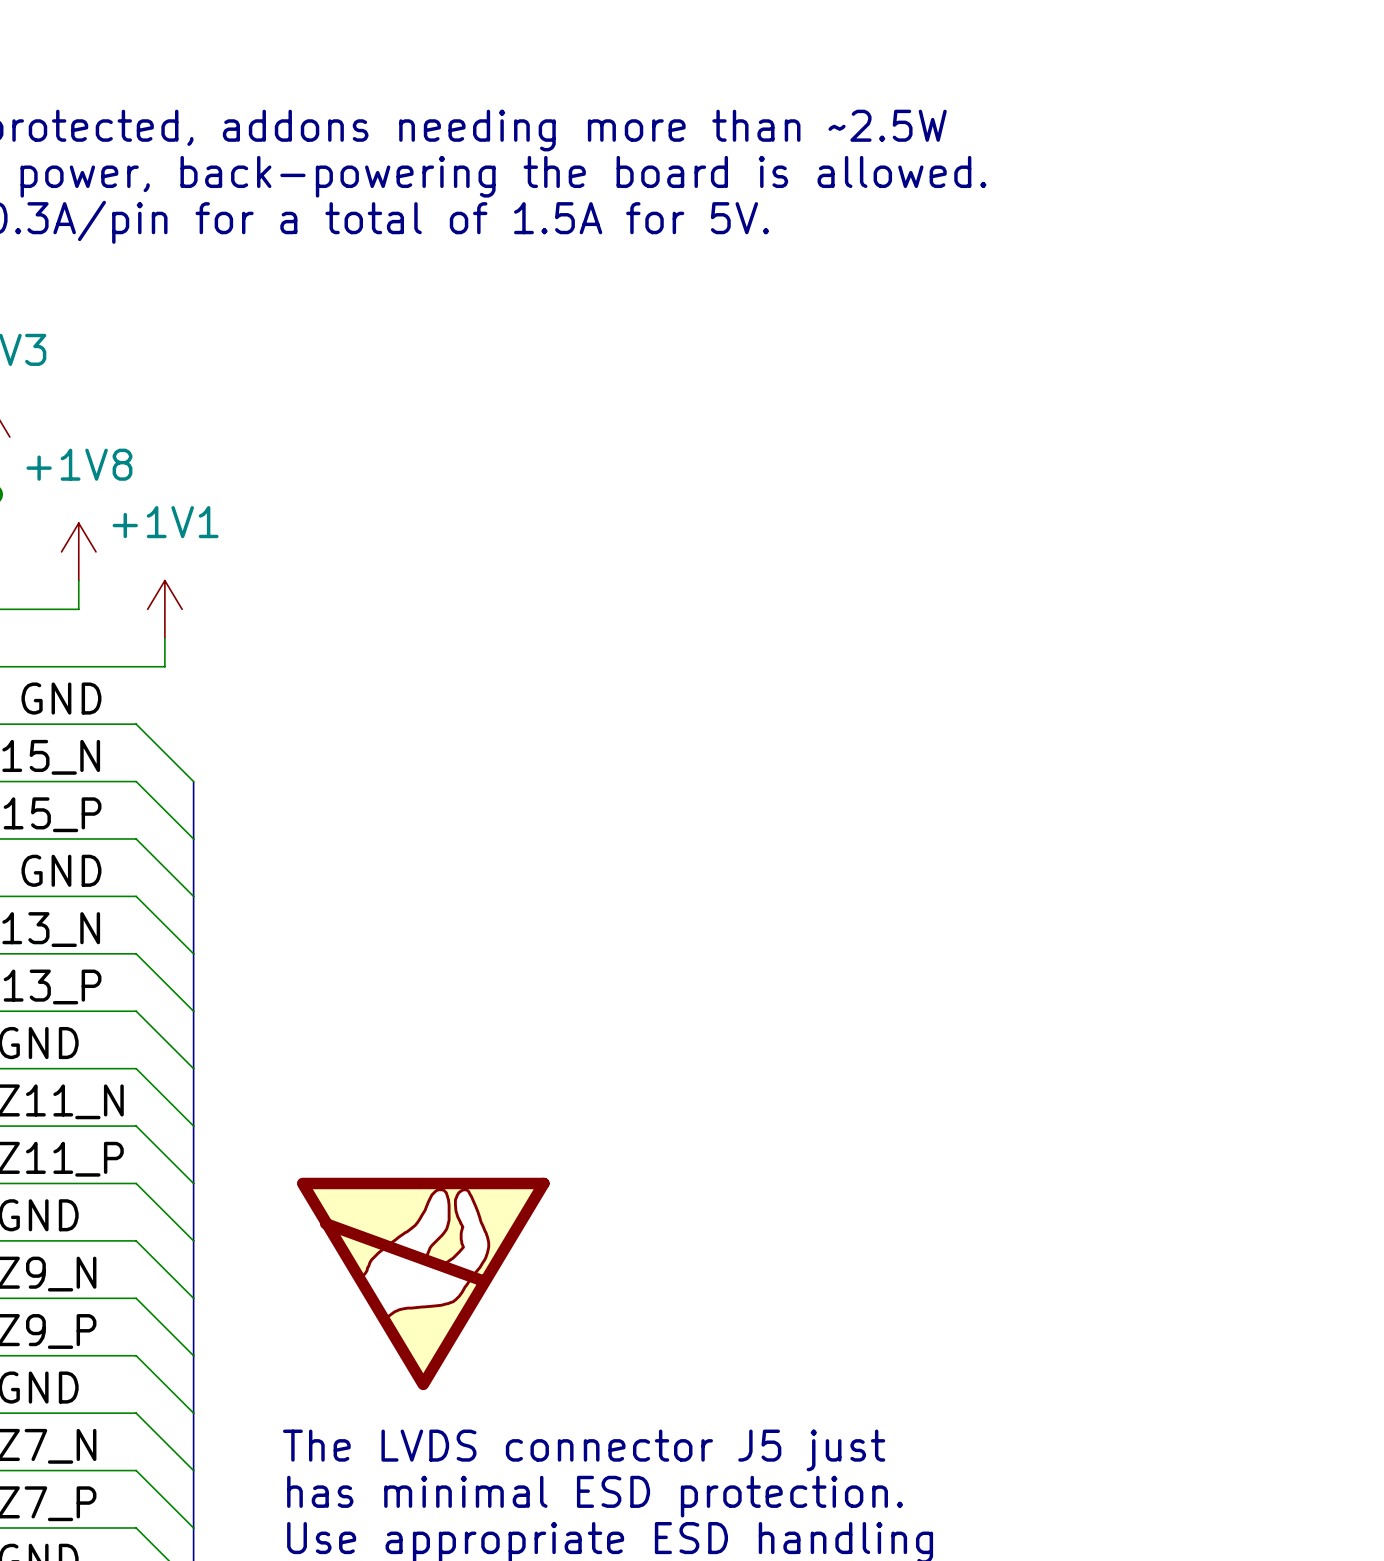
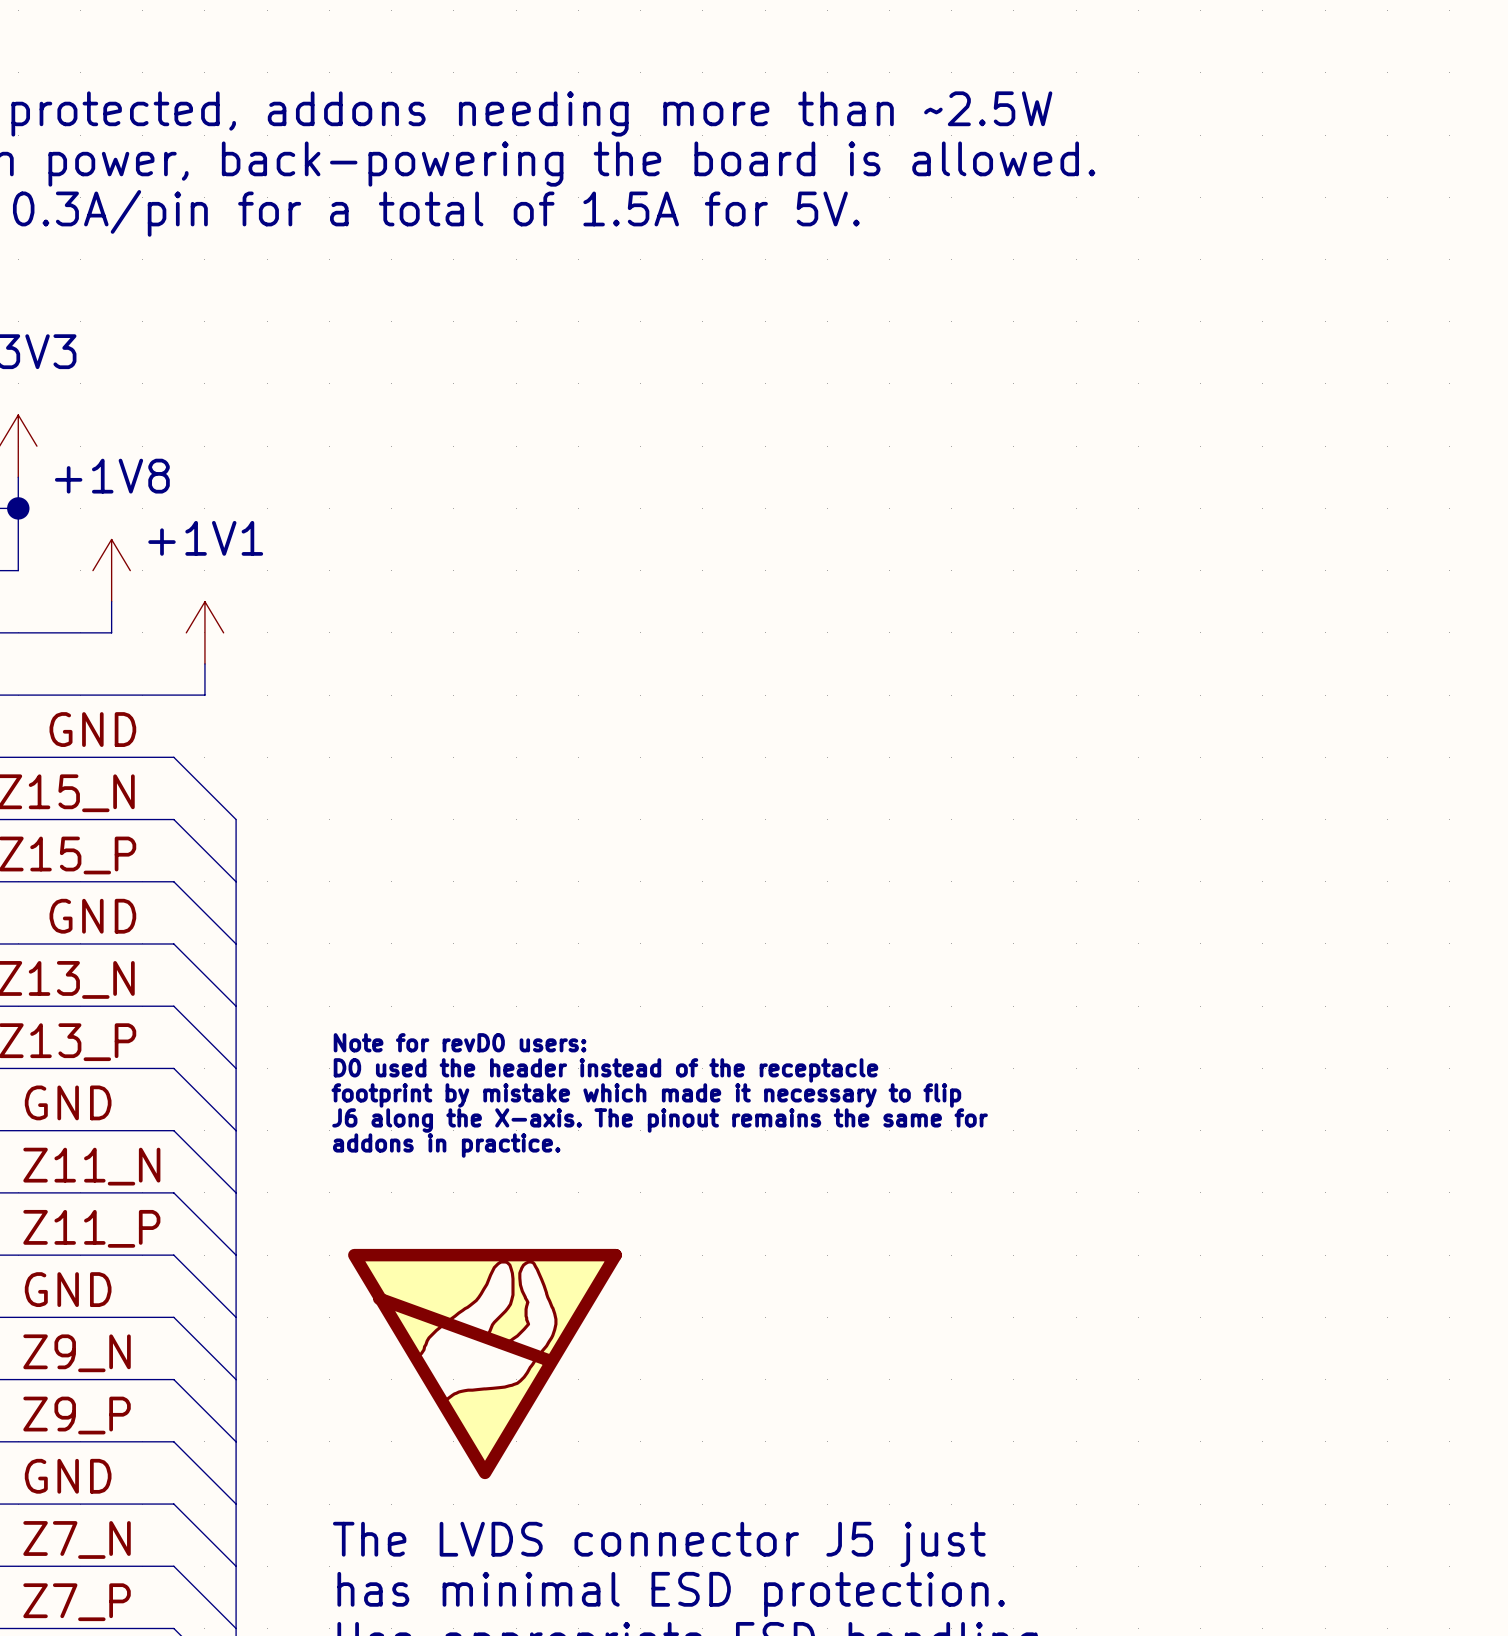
text: none -> Note for revD0 users: (460, 1042)
text: none -> D0 used the header instead of the receptacle (605, 1070)
text: none -> footprint by mistake which made it necessary to flip (646, 1095)
text: none -> J6 along the X-axis. The pinout remains the same for (660, 1120)
text: none -> addons in practice. (446, 1145)

